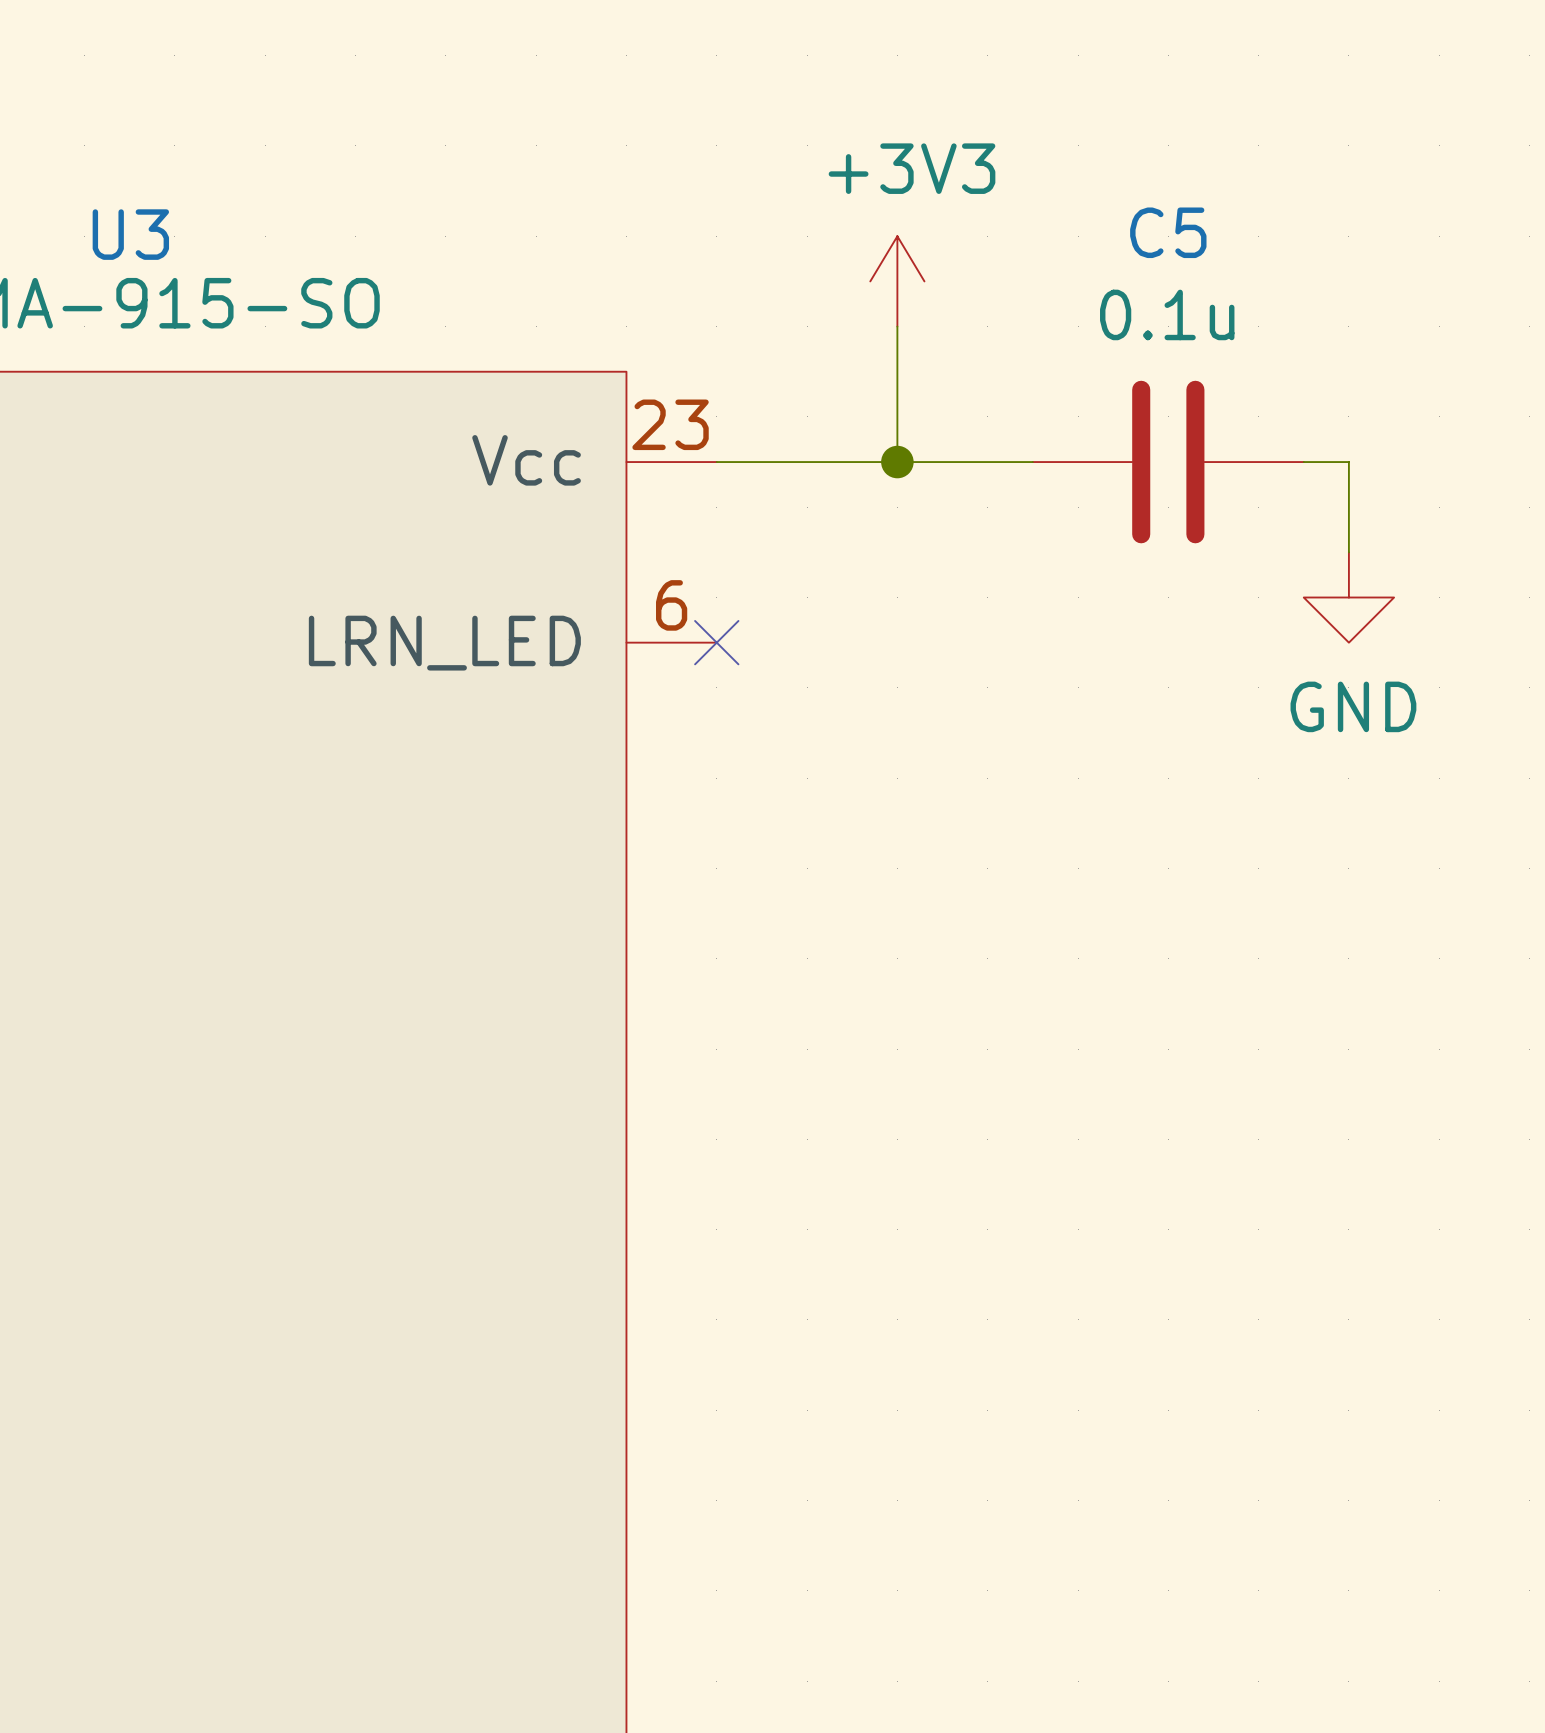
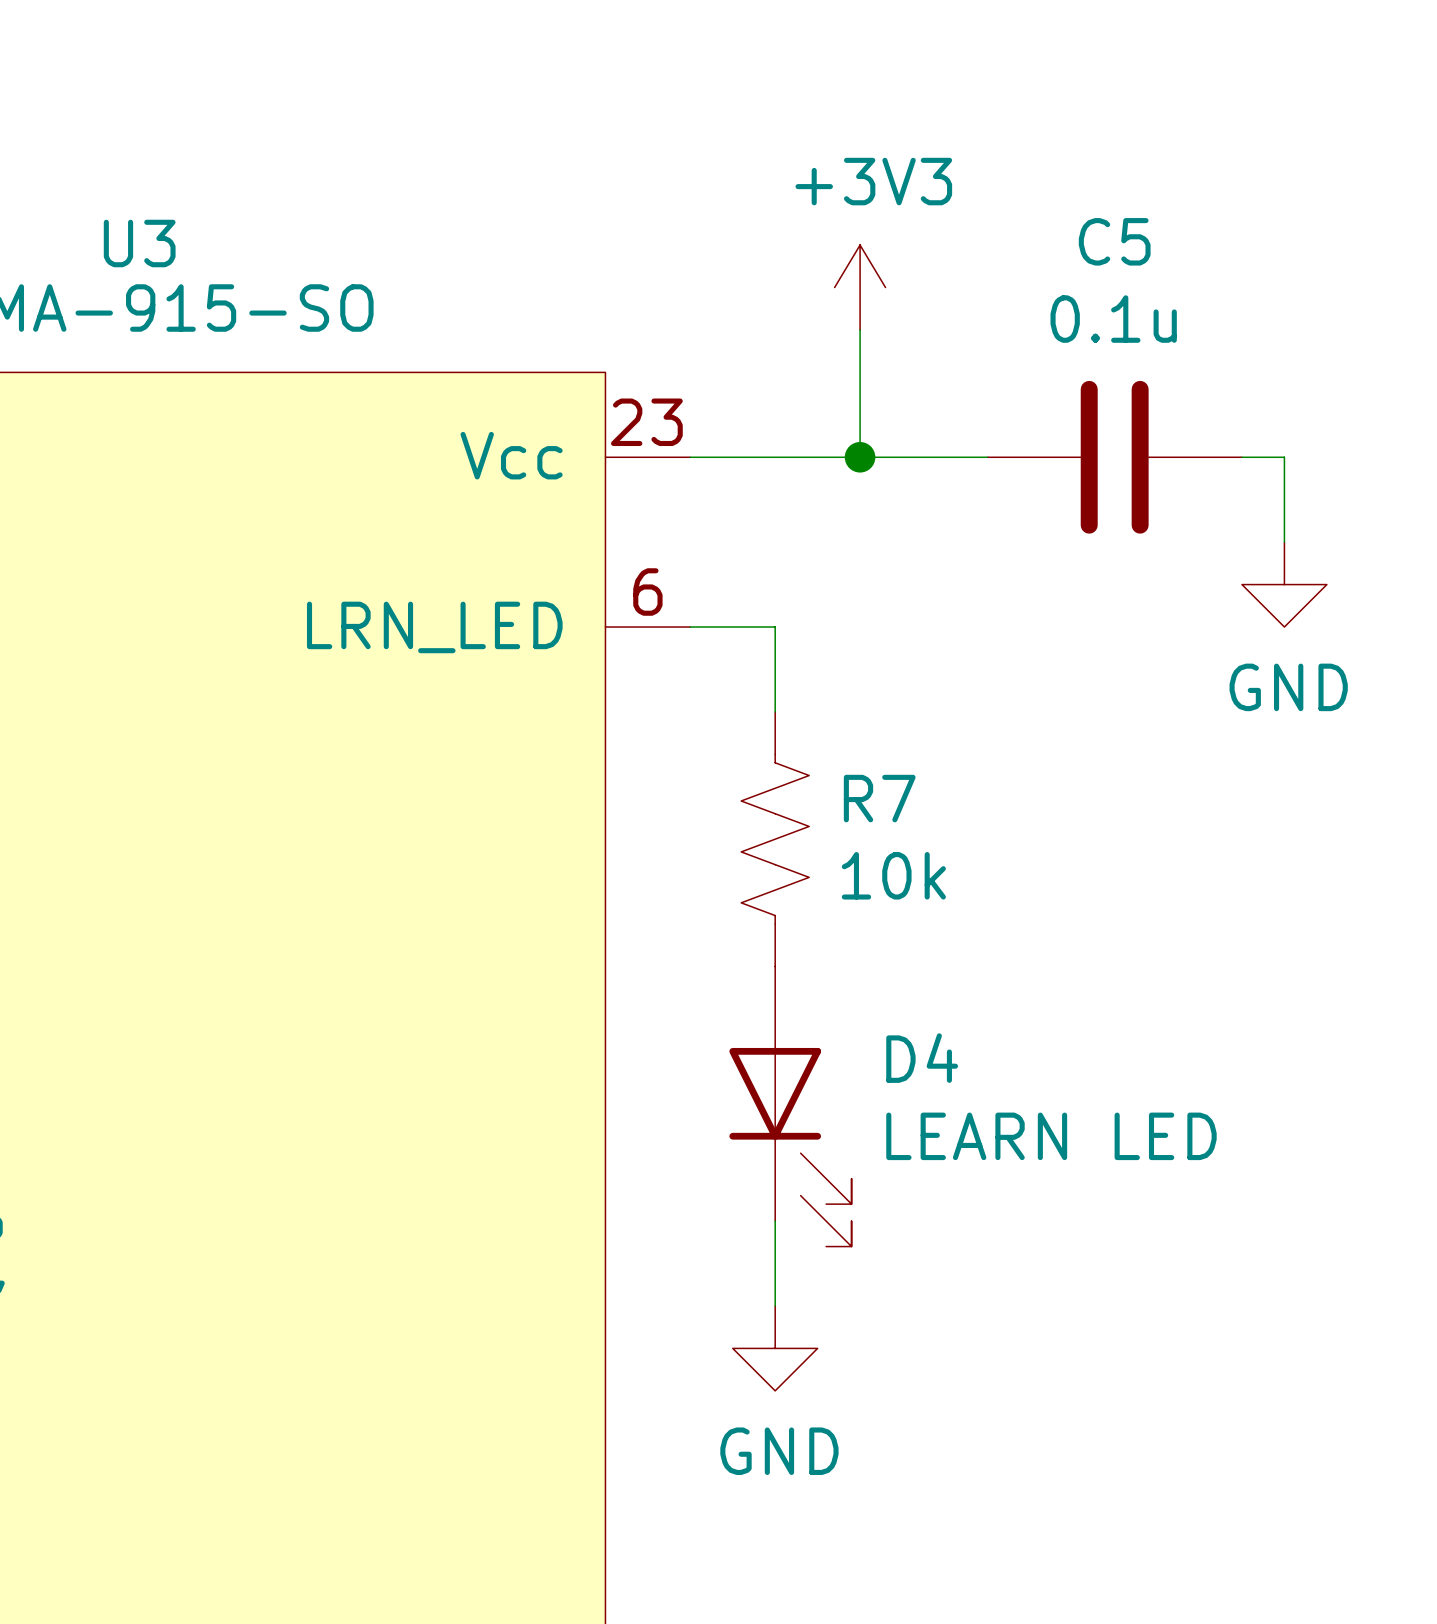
wire: none -> (690, 627) (775, 627) (775, 711)
no-connect mark: (716, 642) -> none
R7: none -> 10k (775, 839)
D4: none -> LEARN LED (790, 1106)
wire: none -> (775, 1221) (775, 1305)
power symbol: none -> GND (775, 1348)

